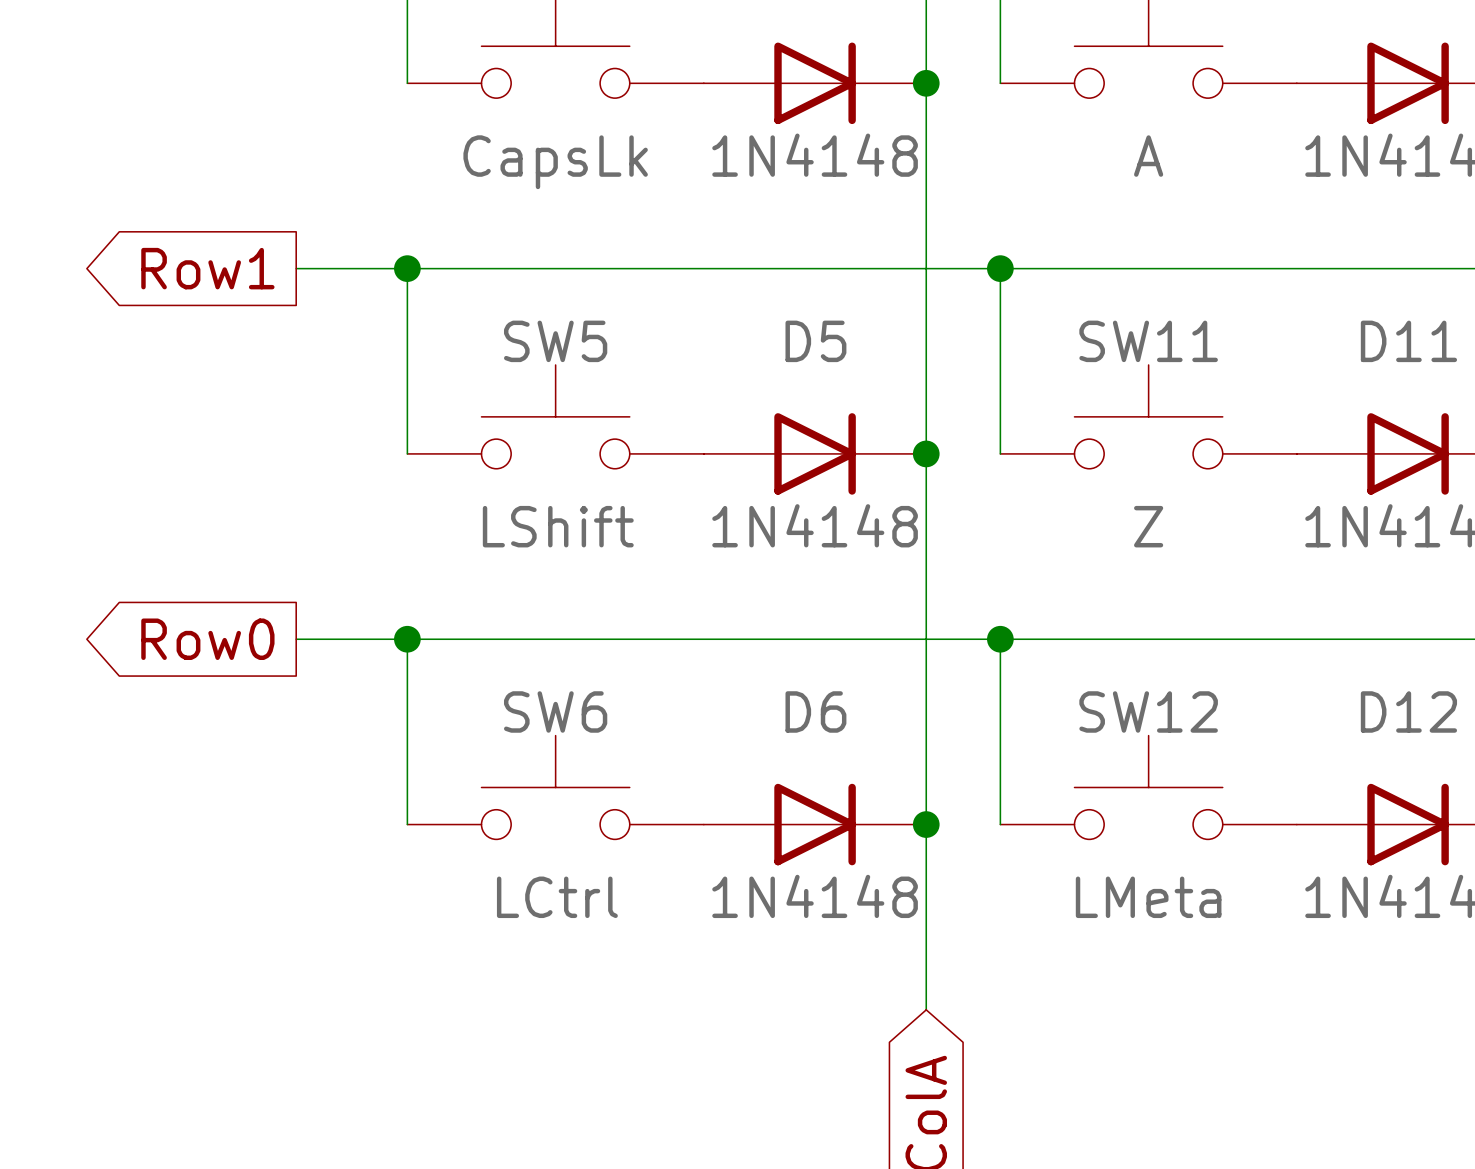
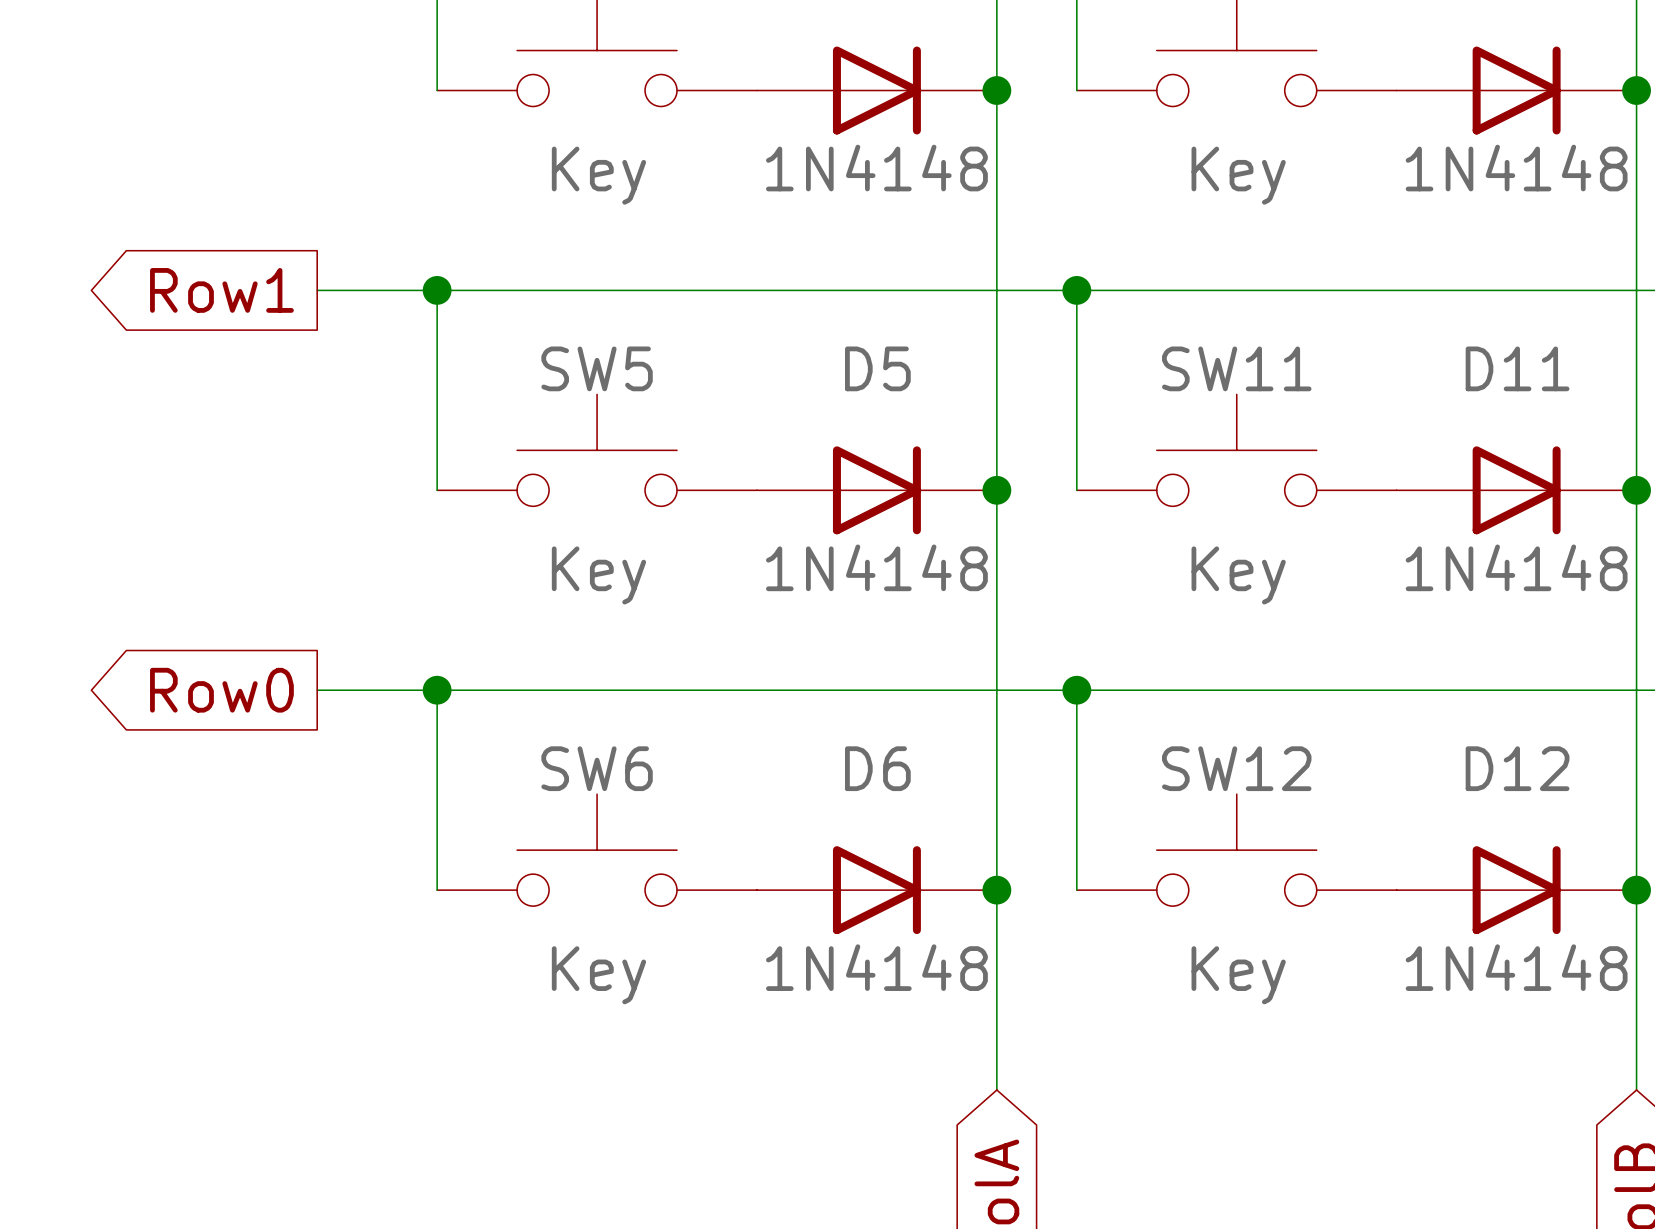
part value: A (1148, 156) -> Key (1238, 175)
part value: CapsLk (555, 162) -> Key (598, 175)
SW5 value: LShift (558, 526) -> Key (598, 575)
SW11 value: Z (1148, 526) -> Key (1238, 575)
SW6 value: LCtrl (557, 897) -> Key (598, 975)
SW12 value: LMeta (1148, 897) -> Key (1238, 975)

